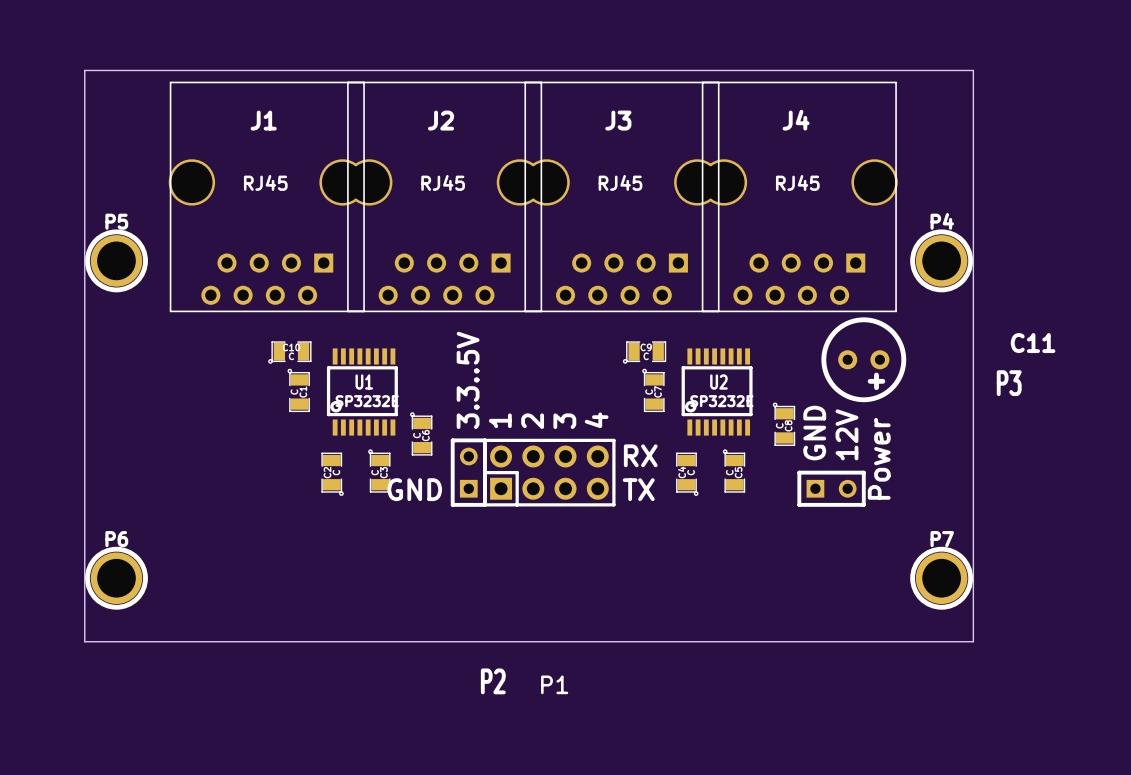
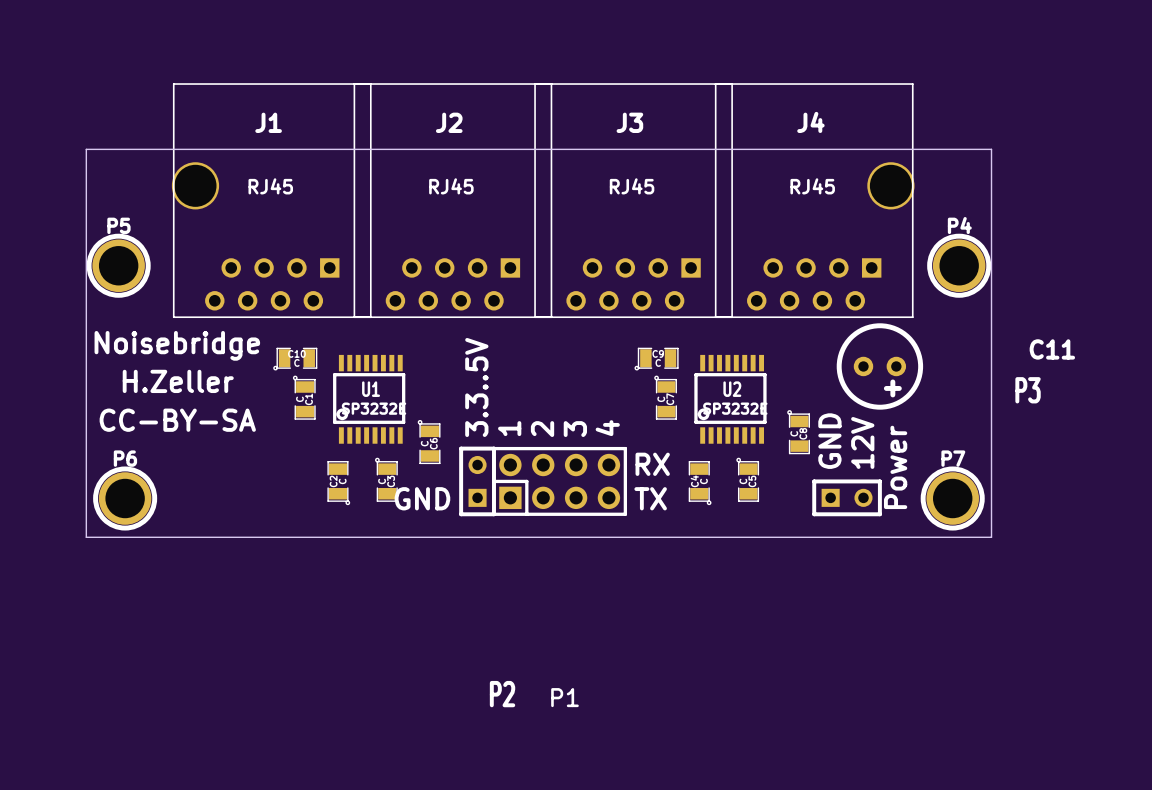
J1 footprint: [168, 81, 366, 313] -> [171, 83, 372, 319]
J2 footprint: [346, 81, 544, 313] -> [353, 83, 553, 319]
J3 footprint: [523, 81, 721, 313] -> [534, 83, 733, 319]
J4 footprint: [700, 81, 898, 313] -> [714, 83, 915, 319]
board edge: (84, 146) (84, 70) (973, 70) (973, 146) -> (86, 149) (991, 149)
text: none -> Noisebridge (177, 345)
text: none -> H.Zeller (178, 381)
text: none -> CC-BY-SA (177, 420)
board edge: (84, 527) (84, 641) (973, 641) (973, 527) -> (86, 537) (991, 537)
P6 position: (116, 578) -> (125, 498)
P7 position: (941, 578) -> (952, 498)

